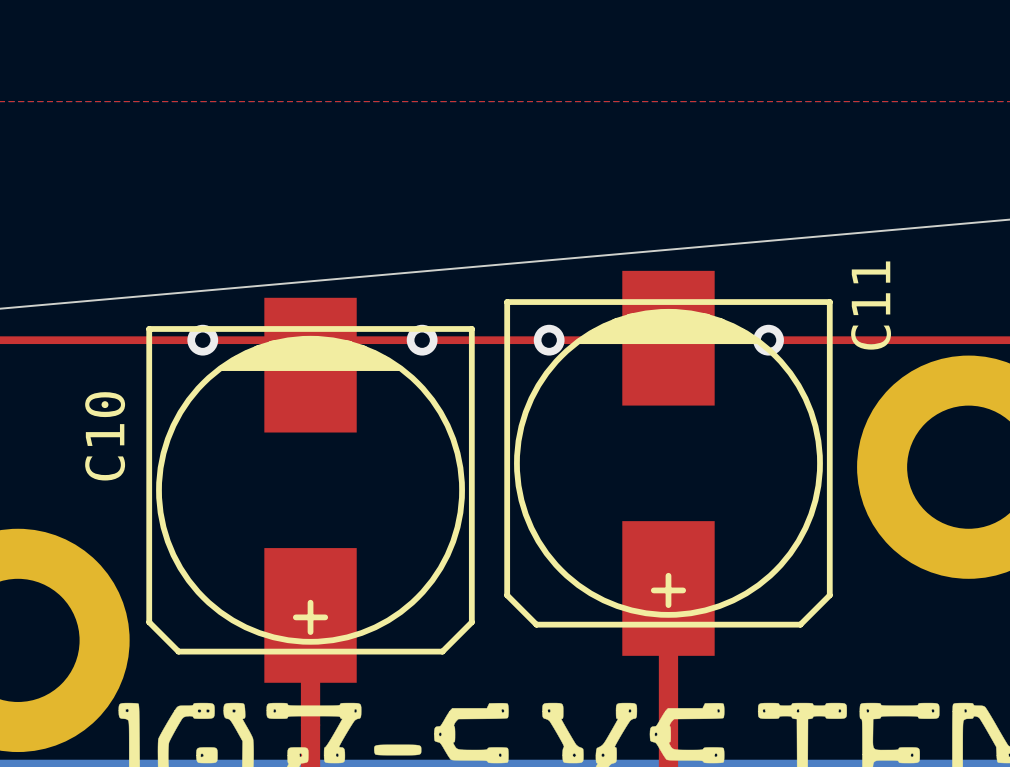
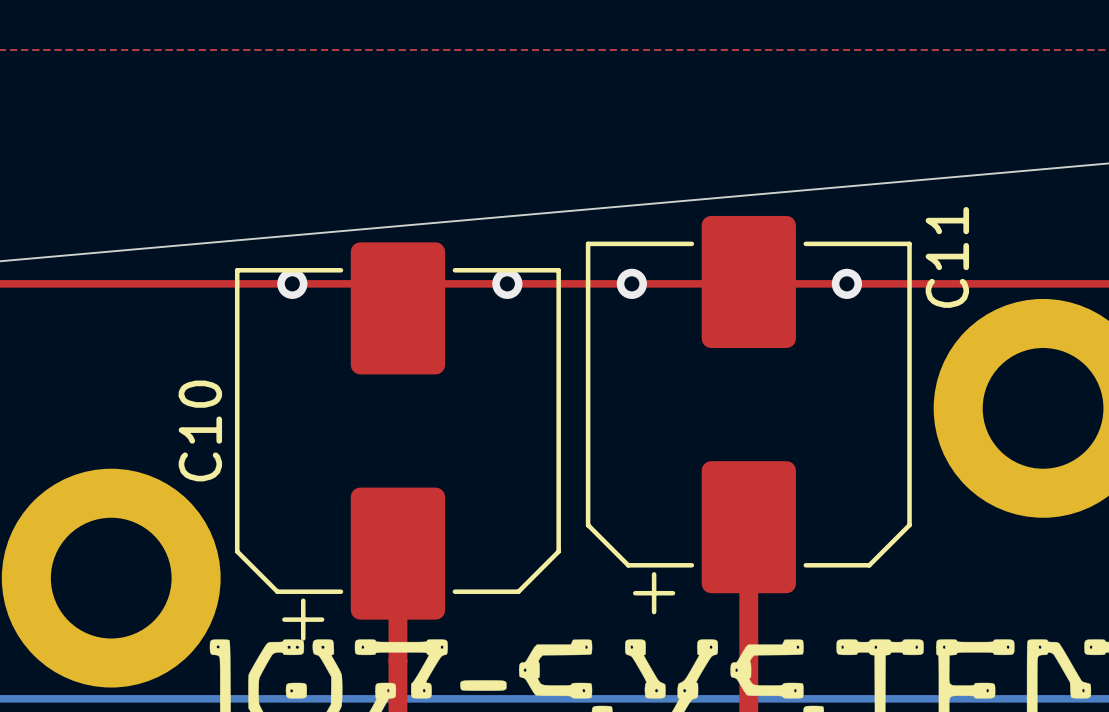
C11 footprint: [504, 270, 833, 656] -> [585, 215, 912, 615]
C10 footprint: [146, 297, 475, 683] -> [234, 242, 561, 641]

